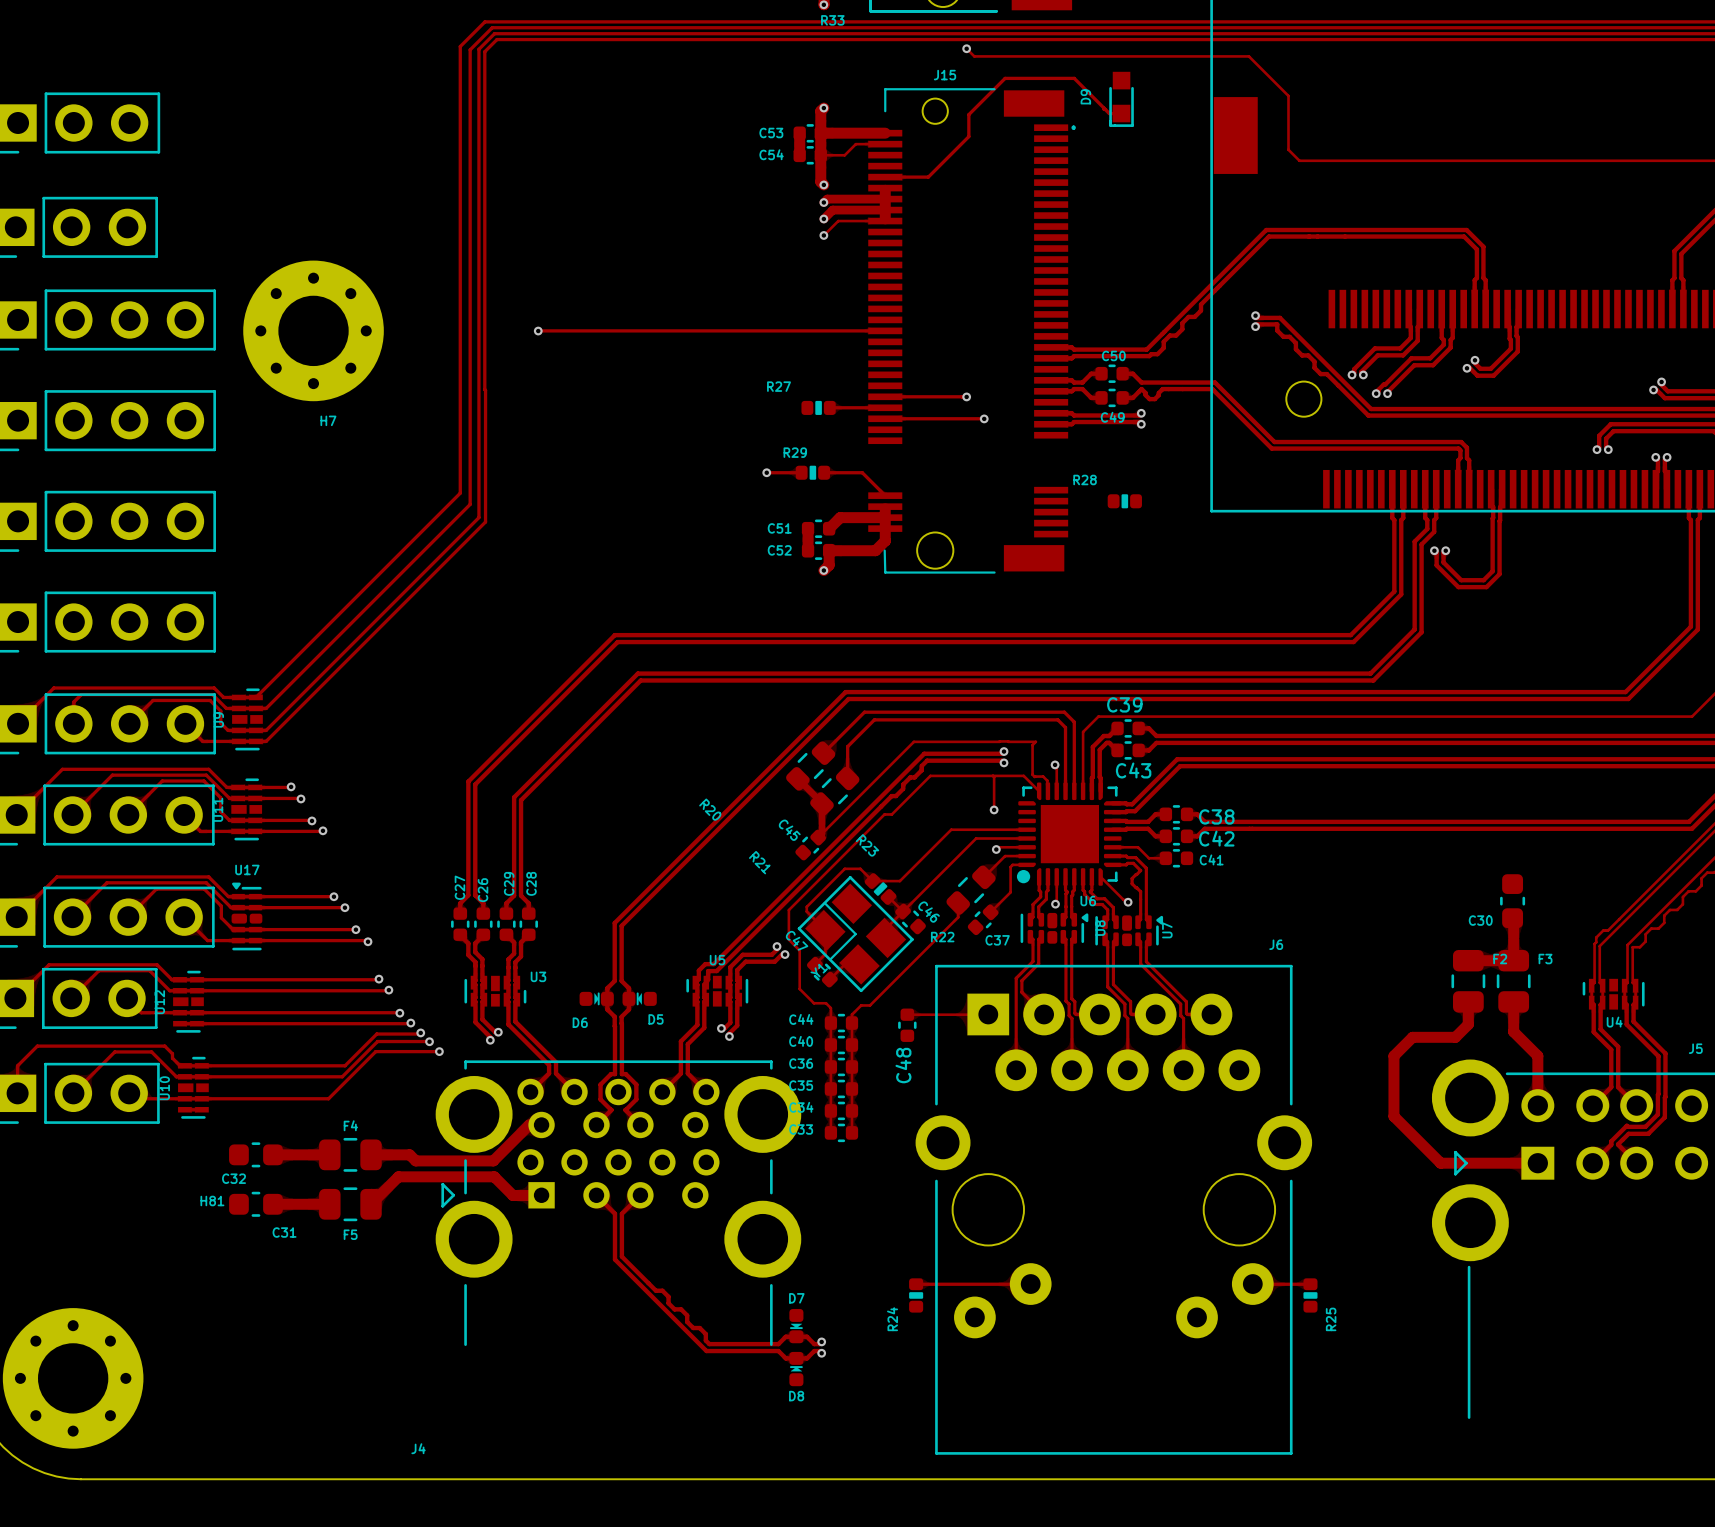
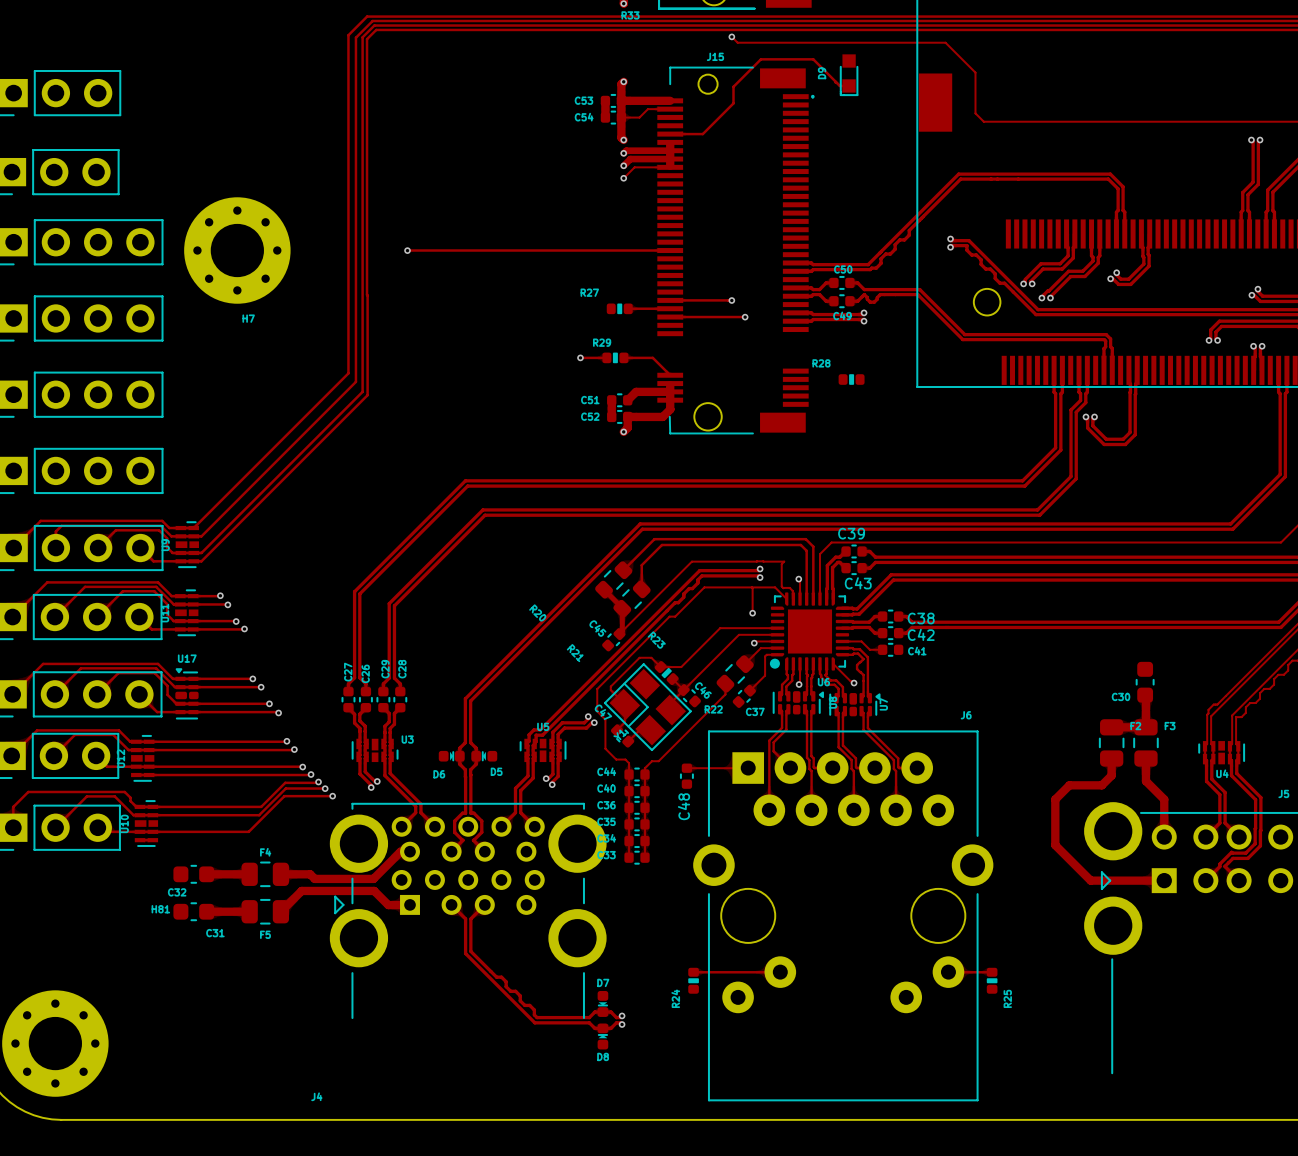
track: none -> (1251, 140) (1253, 141) (1253, 182) (1242, 192) (1241, 233)
via: none -> (1251, 140)
track: none -> (1260, 140) (1258, 141) (1258, 184) (1247, 194) (1249, 233)
via: none -> (1260, 140)

